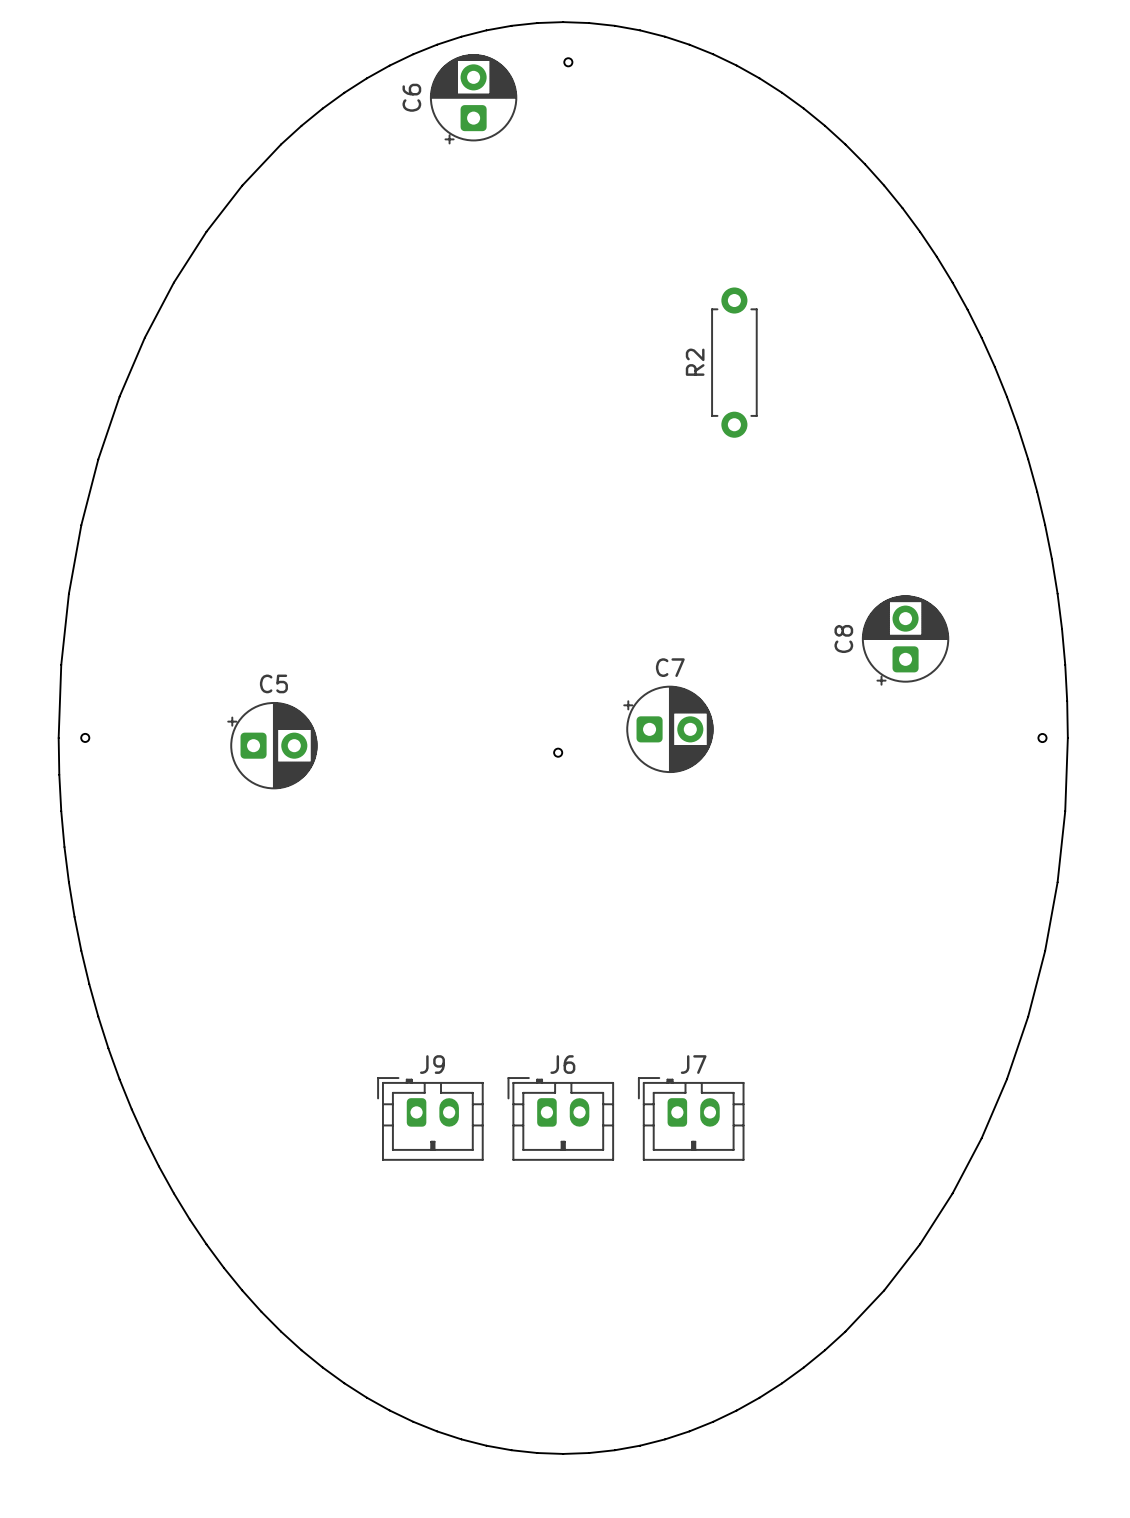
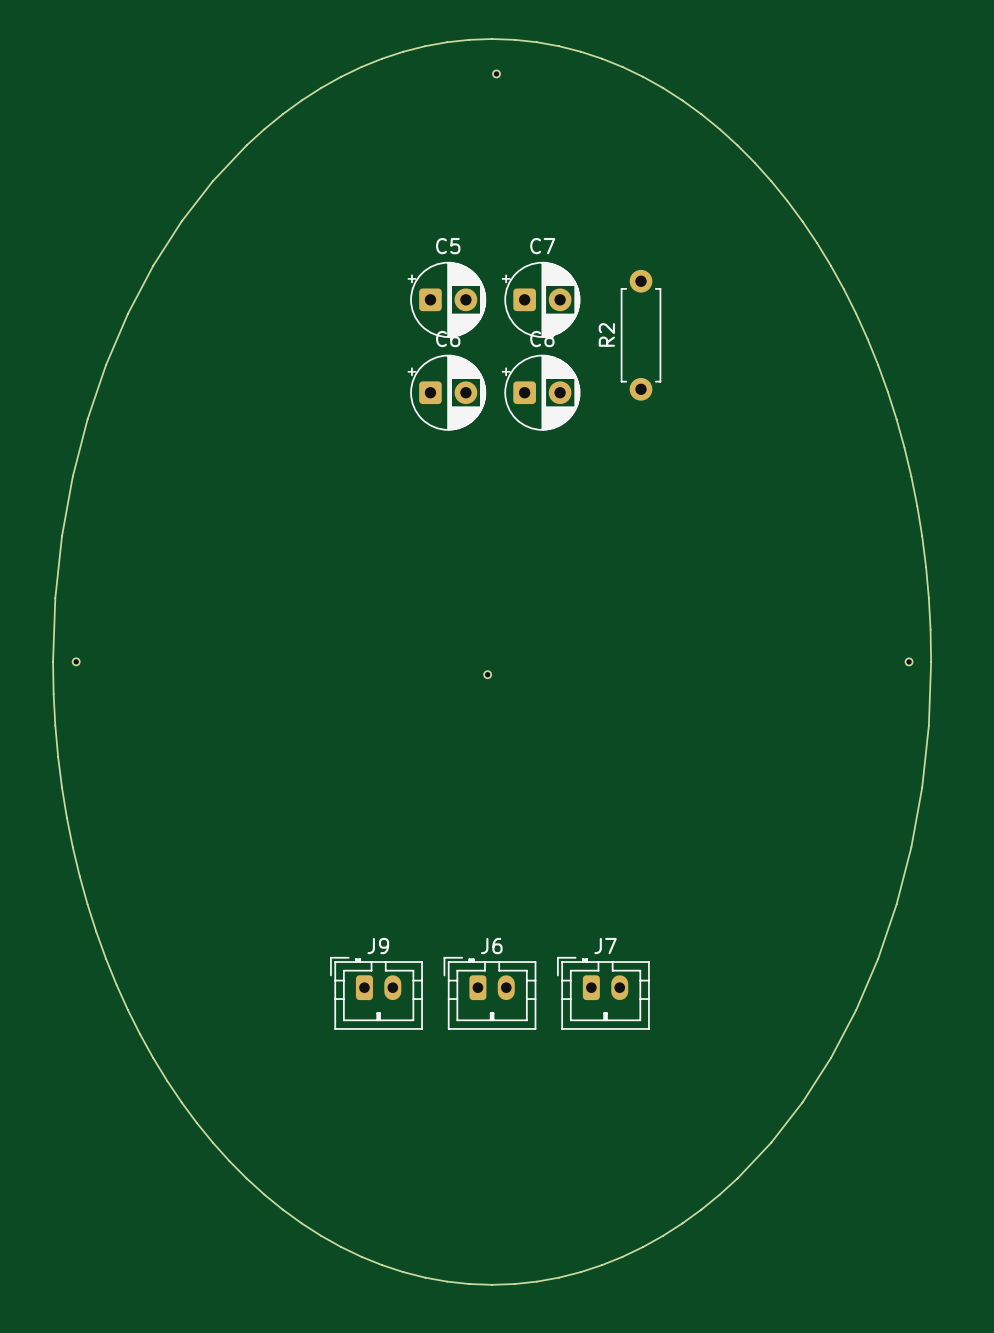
C6 rotation: 0° (473, 99) -> 90° clockwise (446, 392)
C6 position: (473, 99) -> (446, 392)
C8 rotation: 0° (905, 640) -> 90° clockwise (541, 392)
C8 position: (905, 640) -> (541, 392)
C7 position: (668, 729) -> (541, 299)
C5 position: (272, 745) -> (446, 299)

